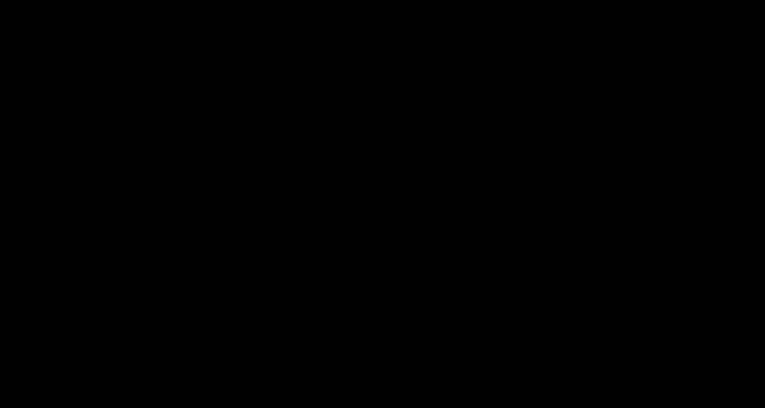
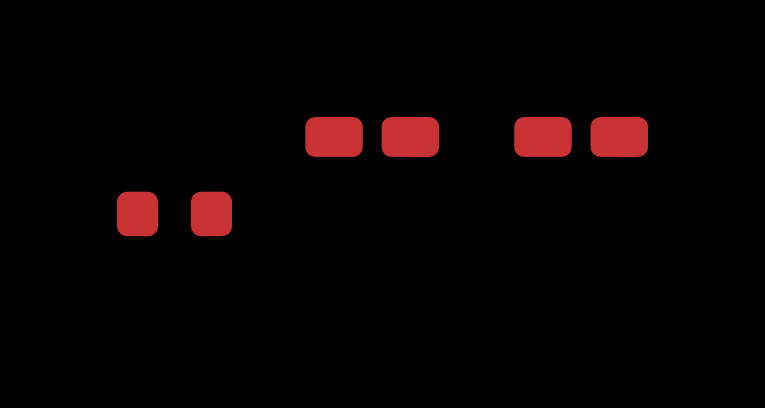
part: none -> (372, 136)
part: none -> (581, 136)
part: none -> (174, 213)

